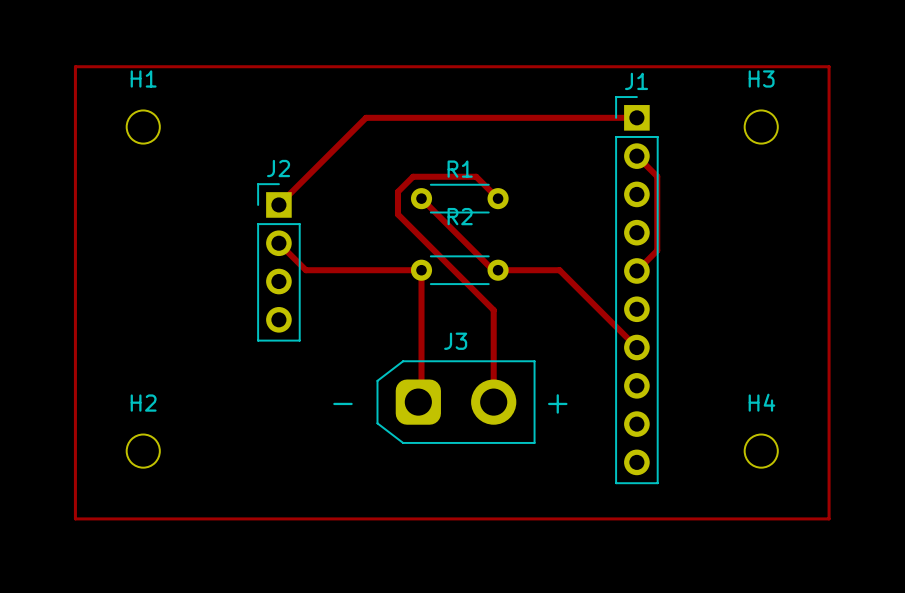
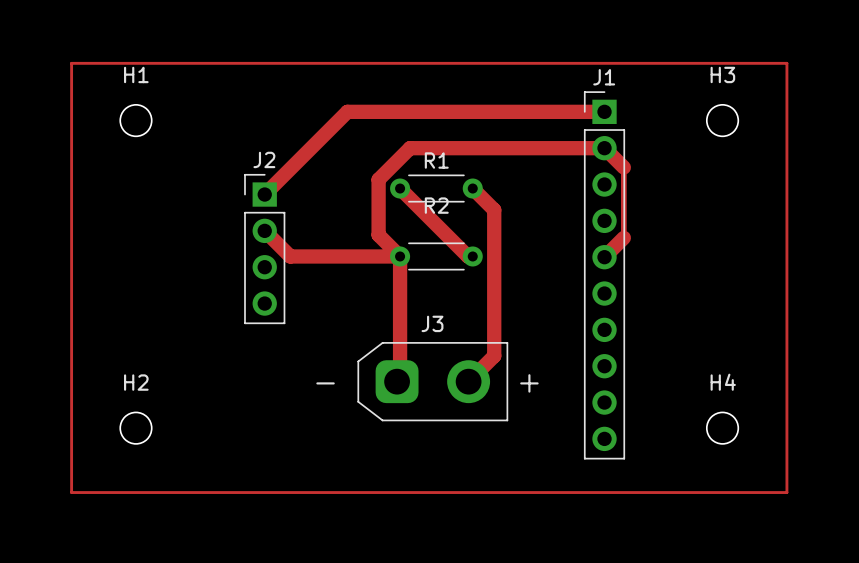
track width: thin (636, 117) (366, 117) (278, 204) -> thick (604, 111) (347, 111) (264, 194)
track: none -> (604, 148) (410, 148) (378, 179) (378, 235) (400, 256)
track width: thin (636, 156) (657, 176) -> thick (604, 148) (623, 167)
track width: thin (421, 198) (493, 270) (498, 270) -> thick (400, 188) (468, 256) (472, 256)
track: (498, 198) (476, 176) (413, 176) (397, 191) (397, 214) (493, 310) (493, 402) -> (472, 188) (494, 210) (494, 356) (468, 381)
track width: thin (278, 243) (305, 270) (421, 270) (421, 398) (418, 402) -> thick (264, 230) (290, 256) (400, 256) (400, 378) (397, 381)
track width: thin (657, 250) (636, 270) -> thick (623, 237) (604, 257)
track: (498, 270) (559, 270) (636, 347) -> none

